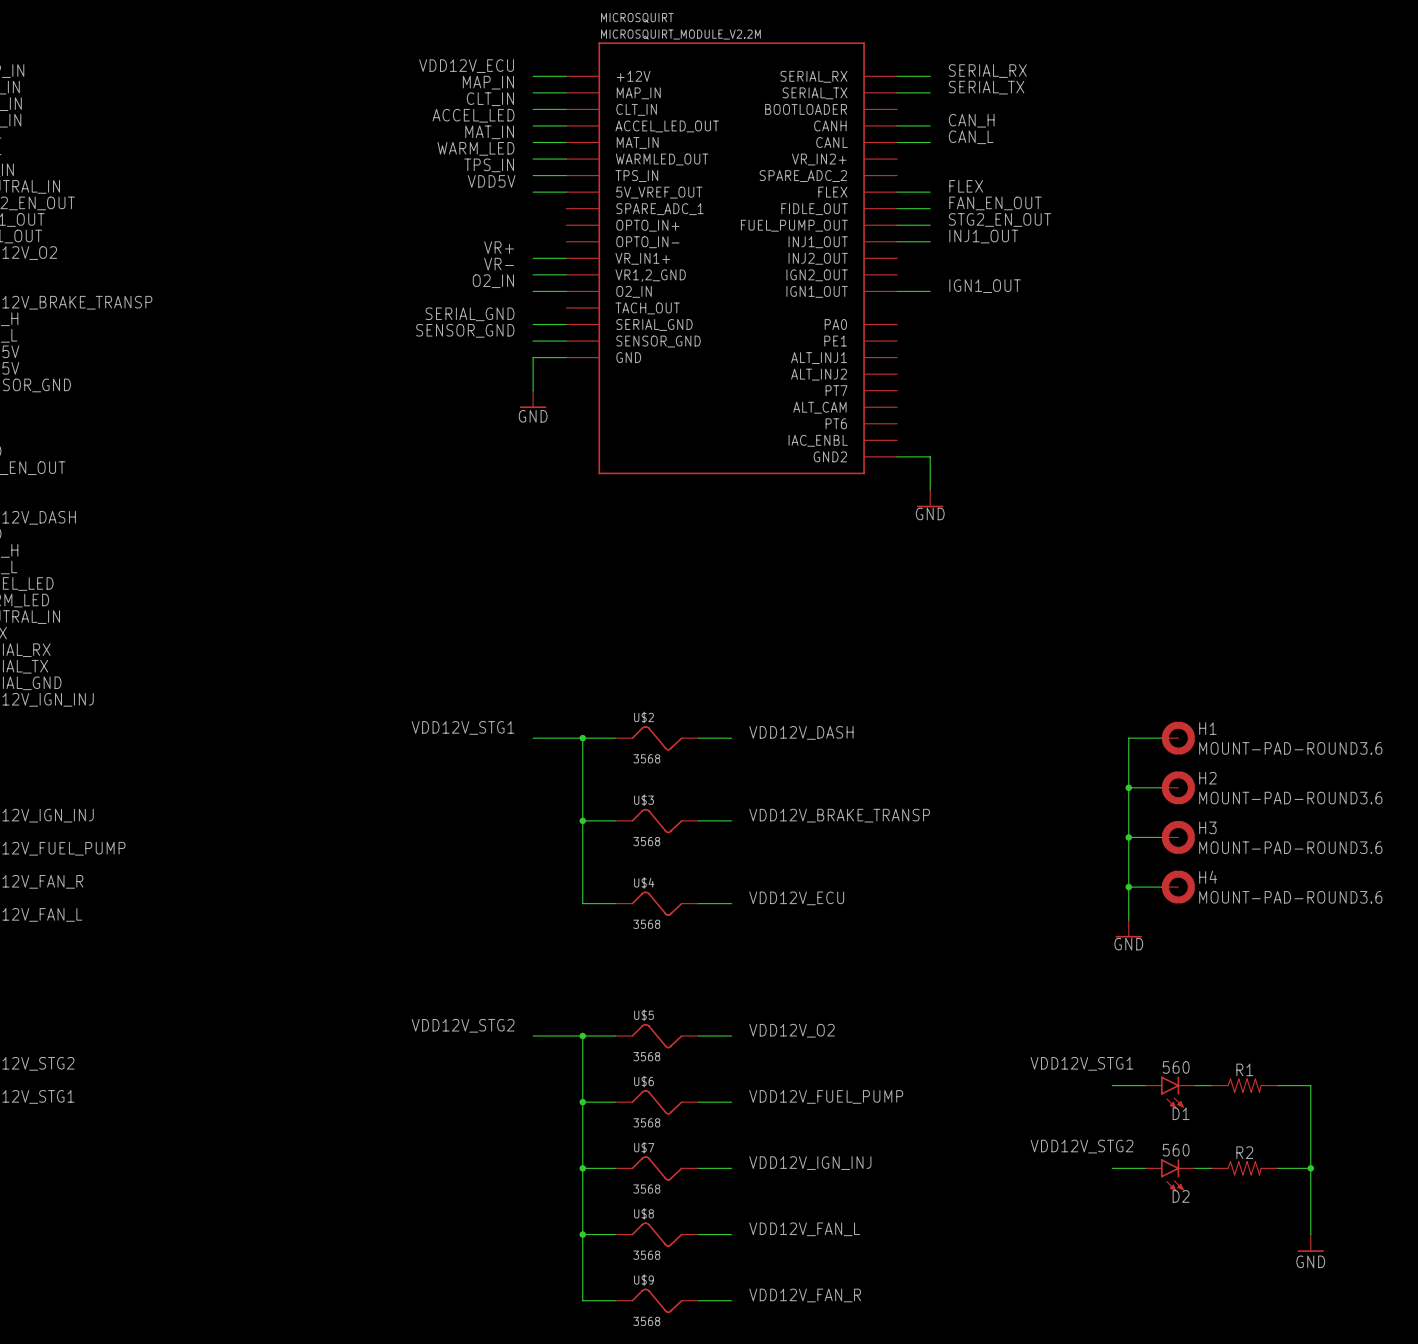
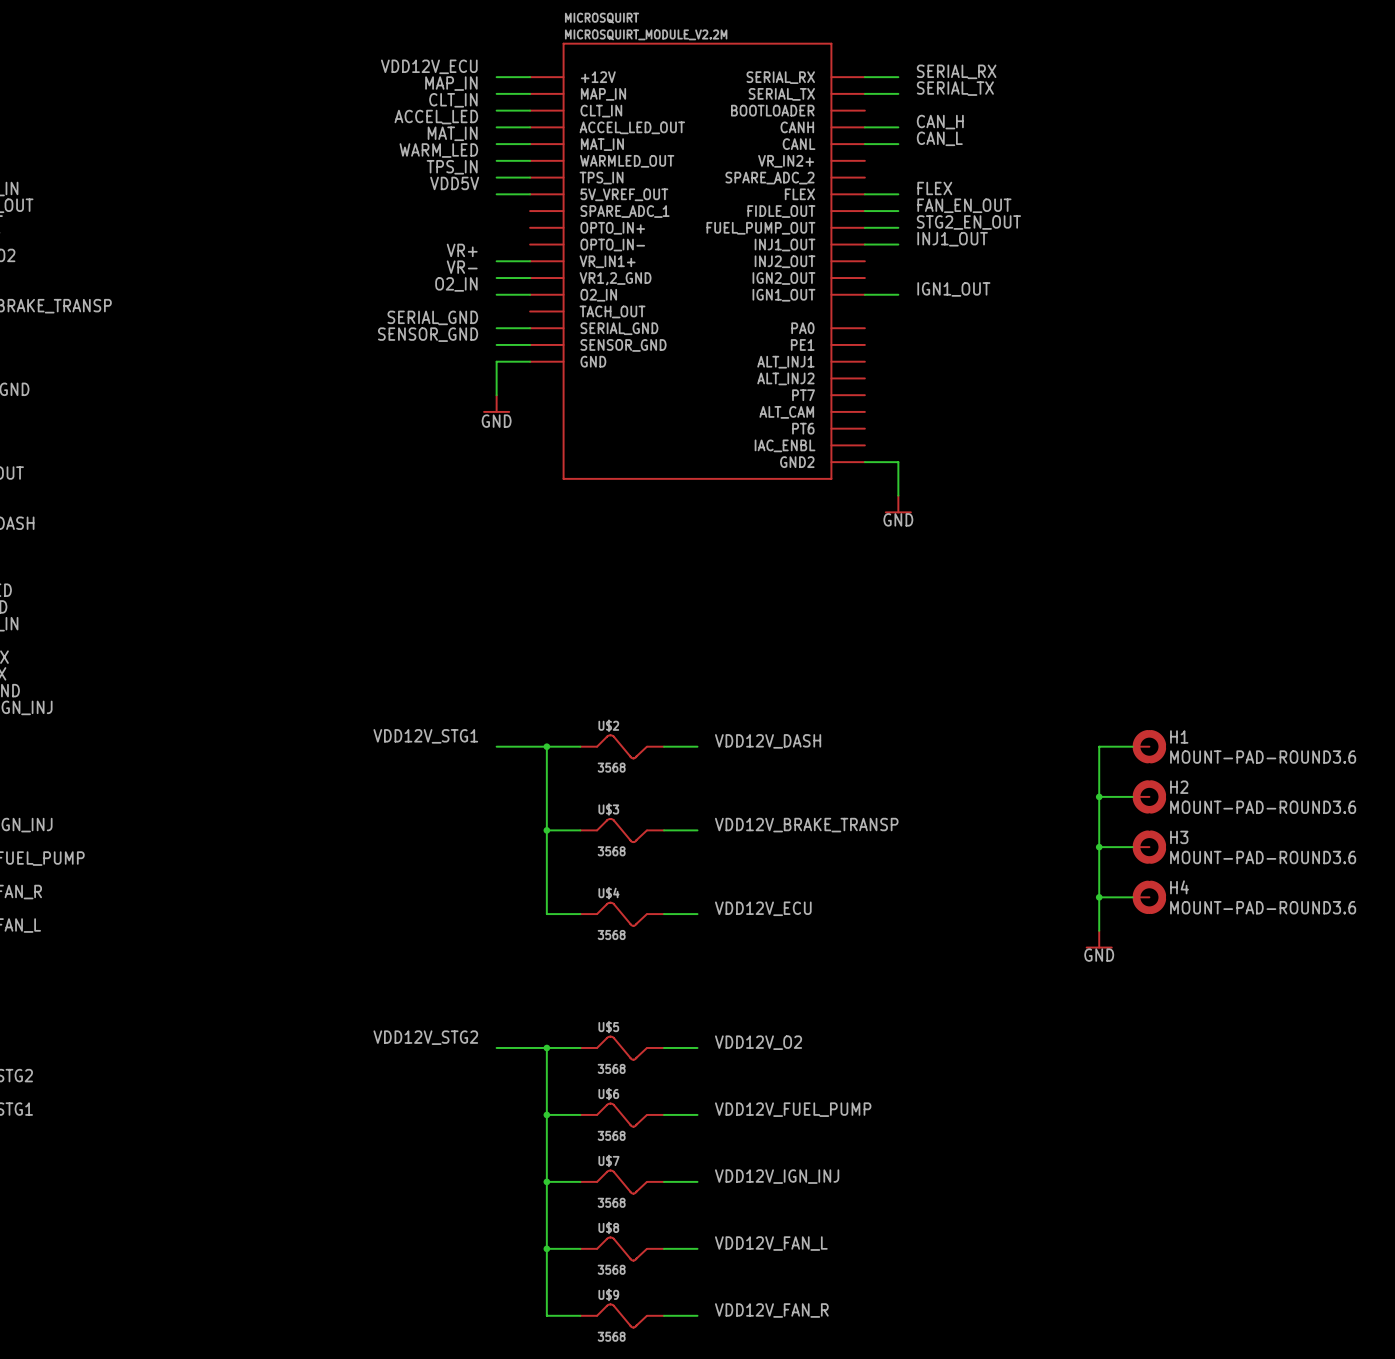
label: VDD12V_STG1 (1081, 1063) -> none
wire: (1112, 1085) (1145, 1085) -> none
wire: (1194, 1085) (1211, 1085) -> none
R1: (1244, 1085) -> none
wire: (1277, 1085) (1310, 1085) (1310, 1234) -> none
D1: 560 (1170, 1092) -> none
label: VDD12V_STG2 (1081, 1146) -> none
wire: (1112, 1168) (1145, 1168) -> none
wire: (1194, 1168) (1211, 1168) -> none
R2: (1244, 1168) -> none
wire: (1277, 1168) (1310, 1168) -> none
junction: (1310, 1168) -> none
D2: 560 (1170, 1175) -> none
power symbol: GND (1310, 1243) -> none

